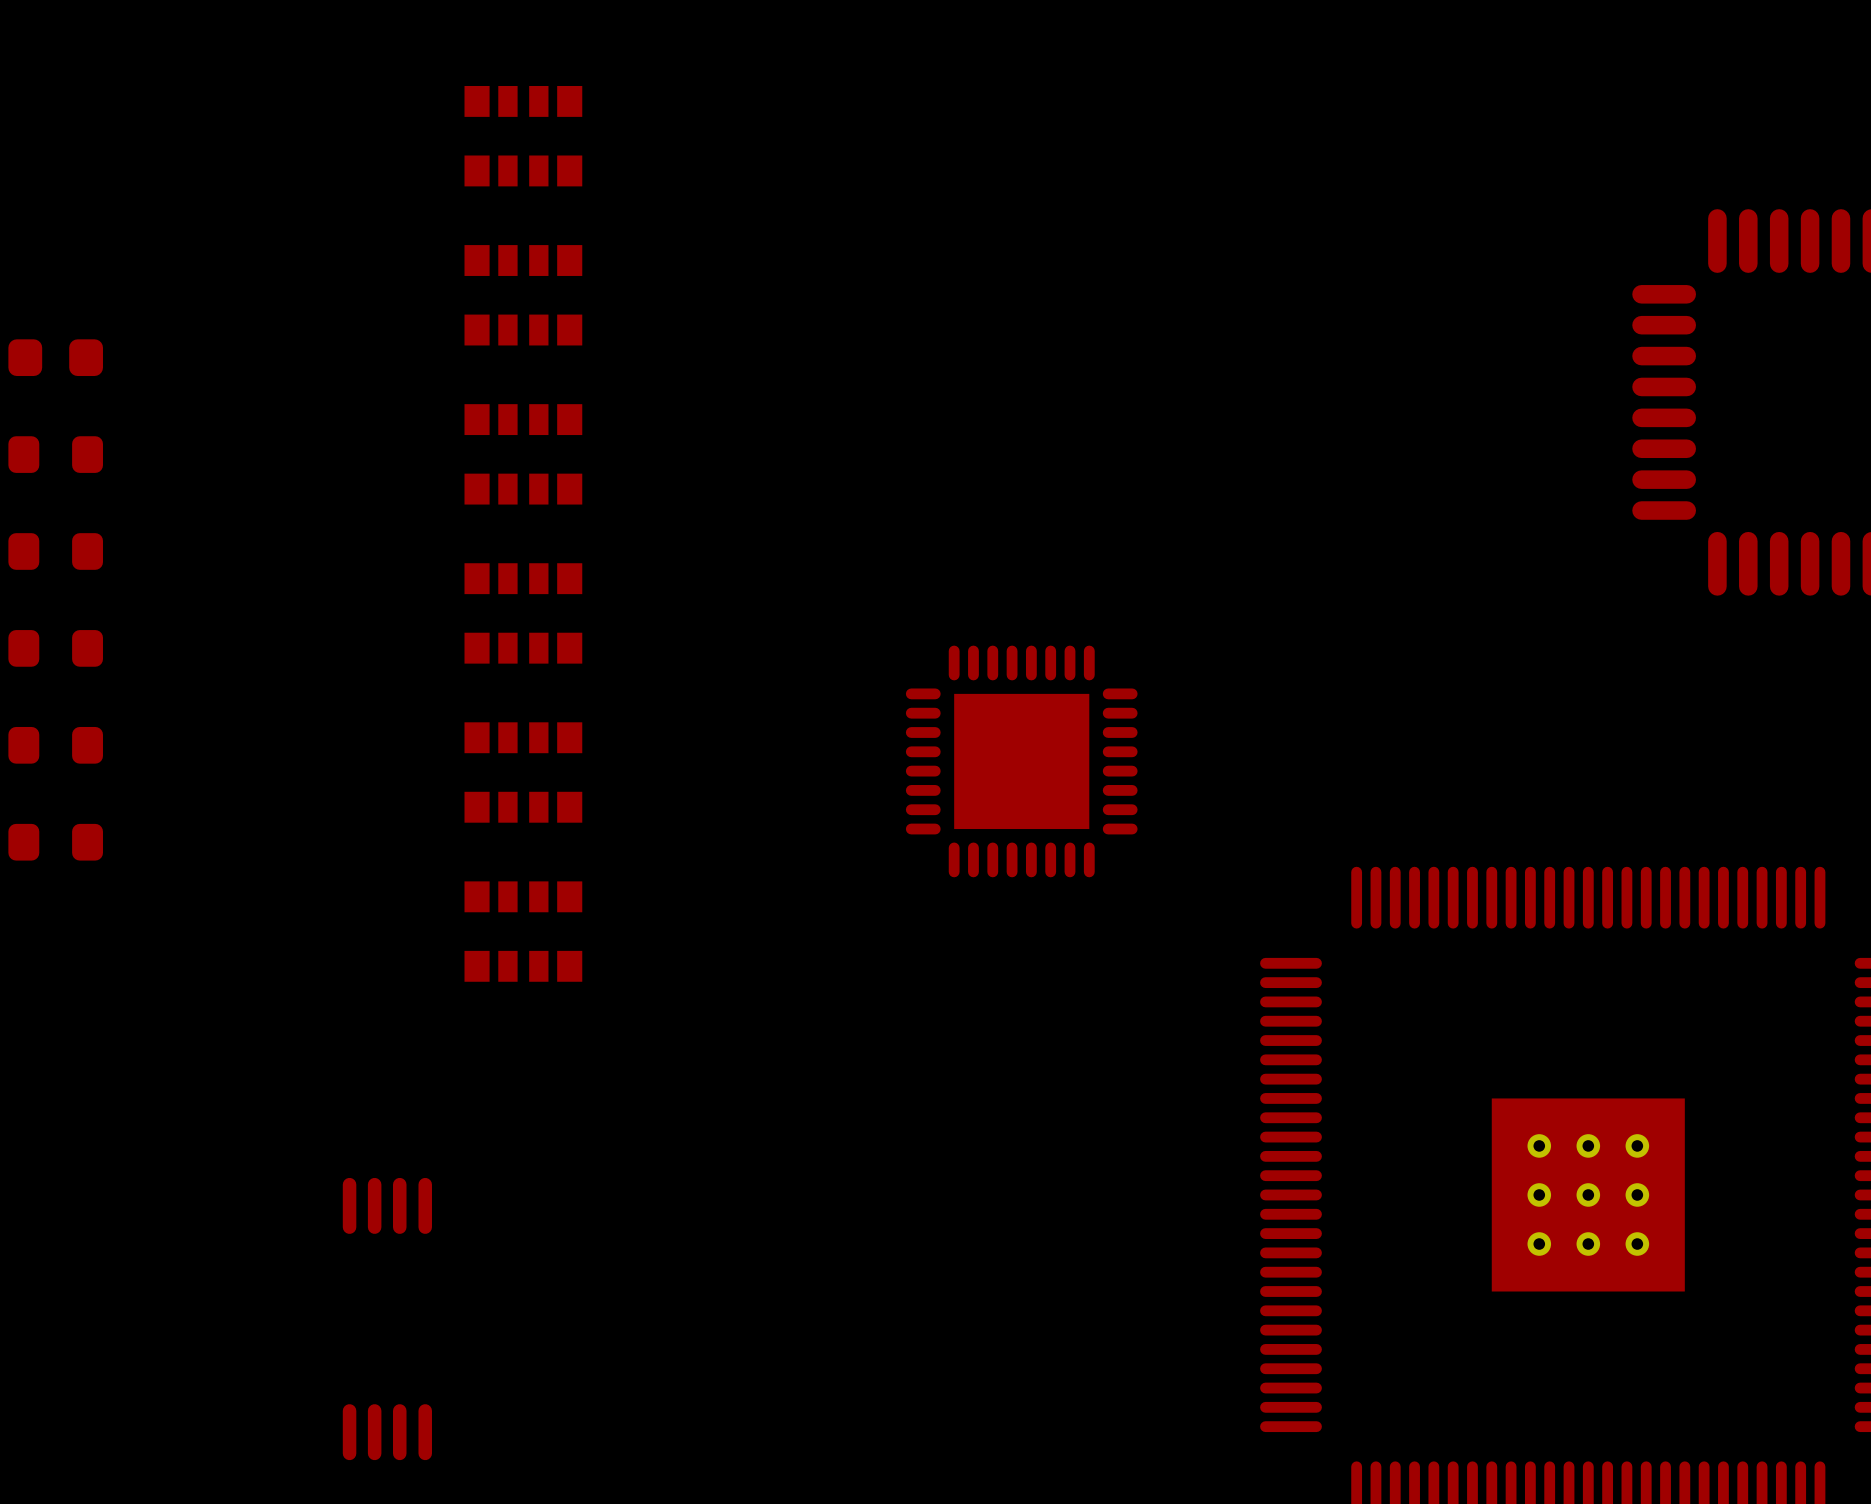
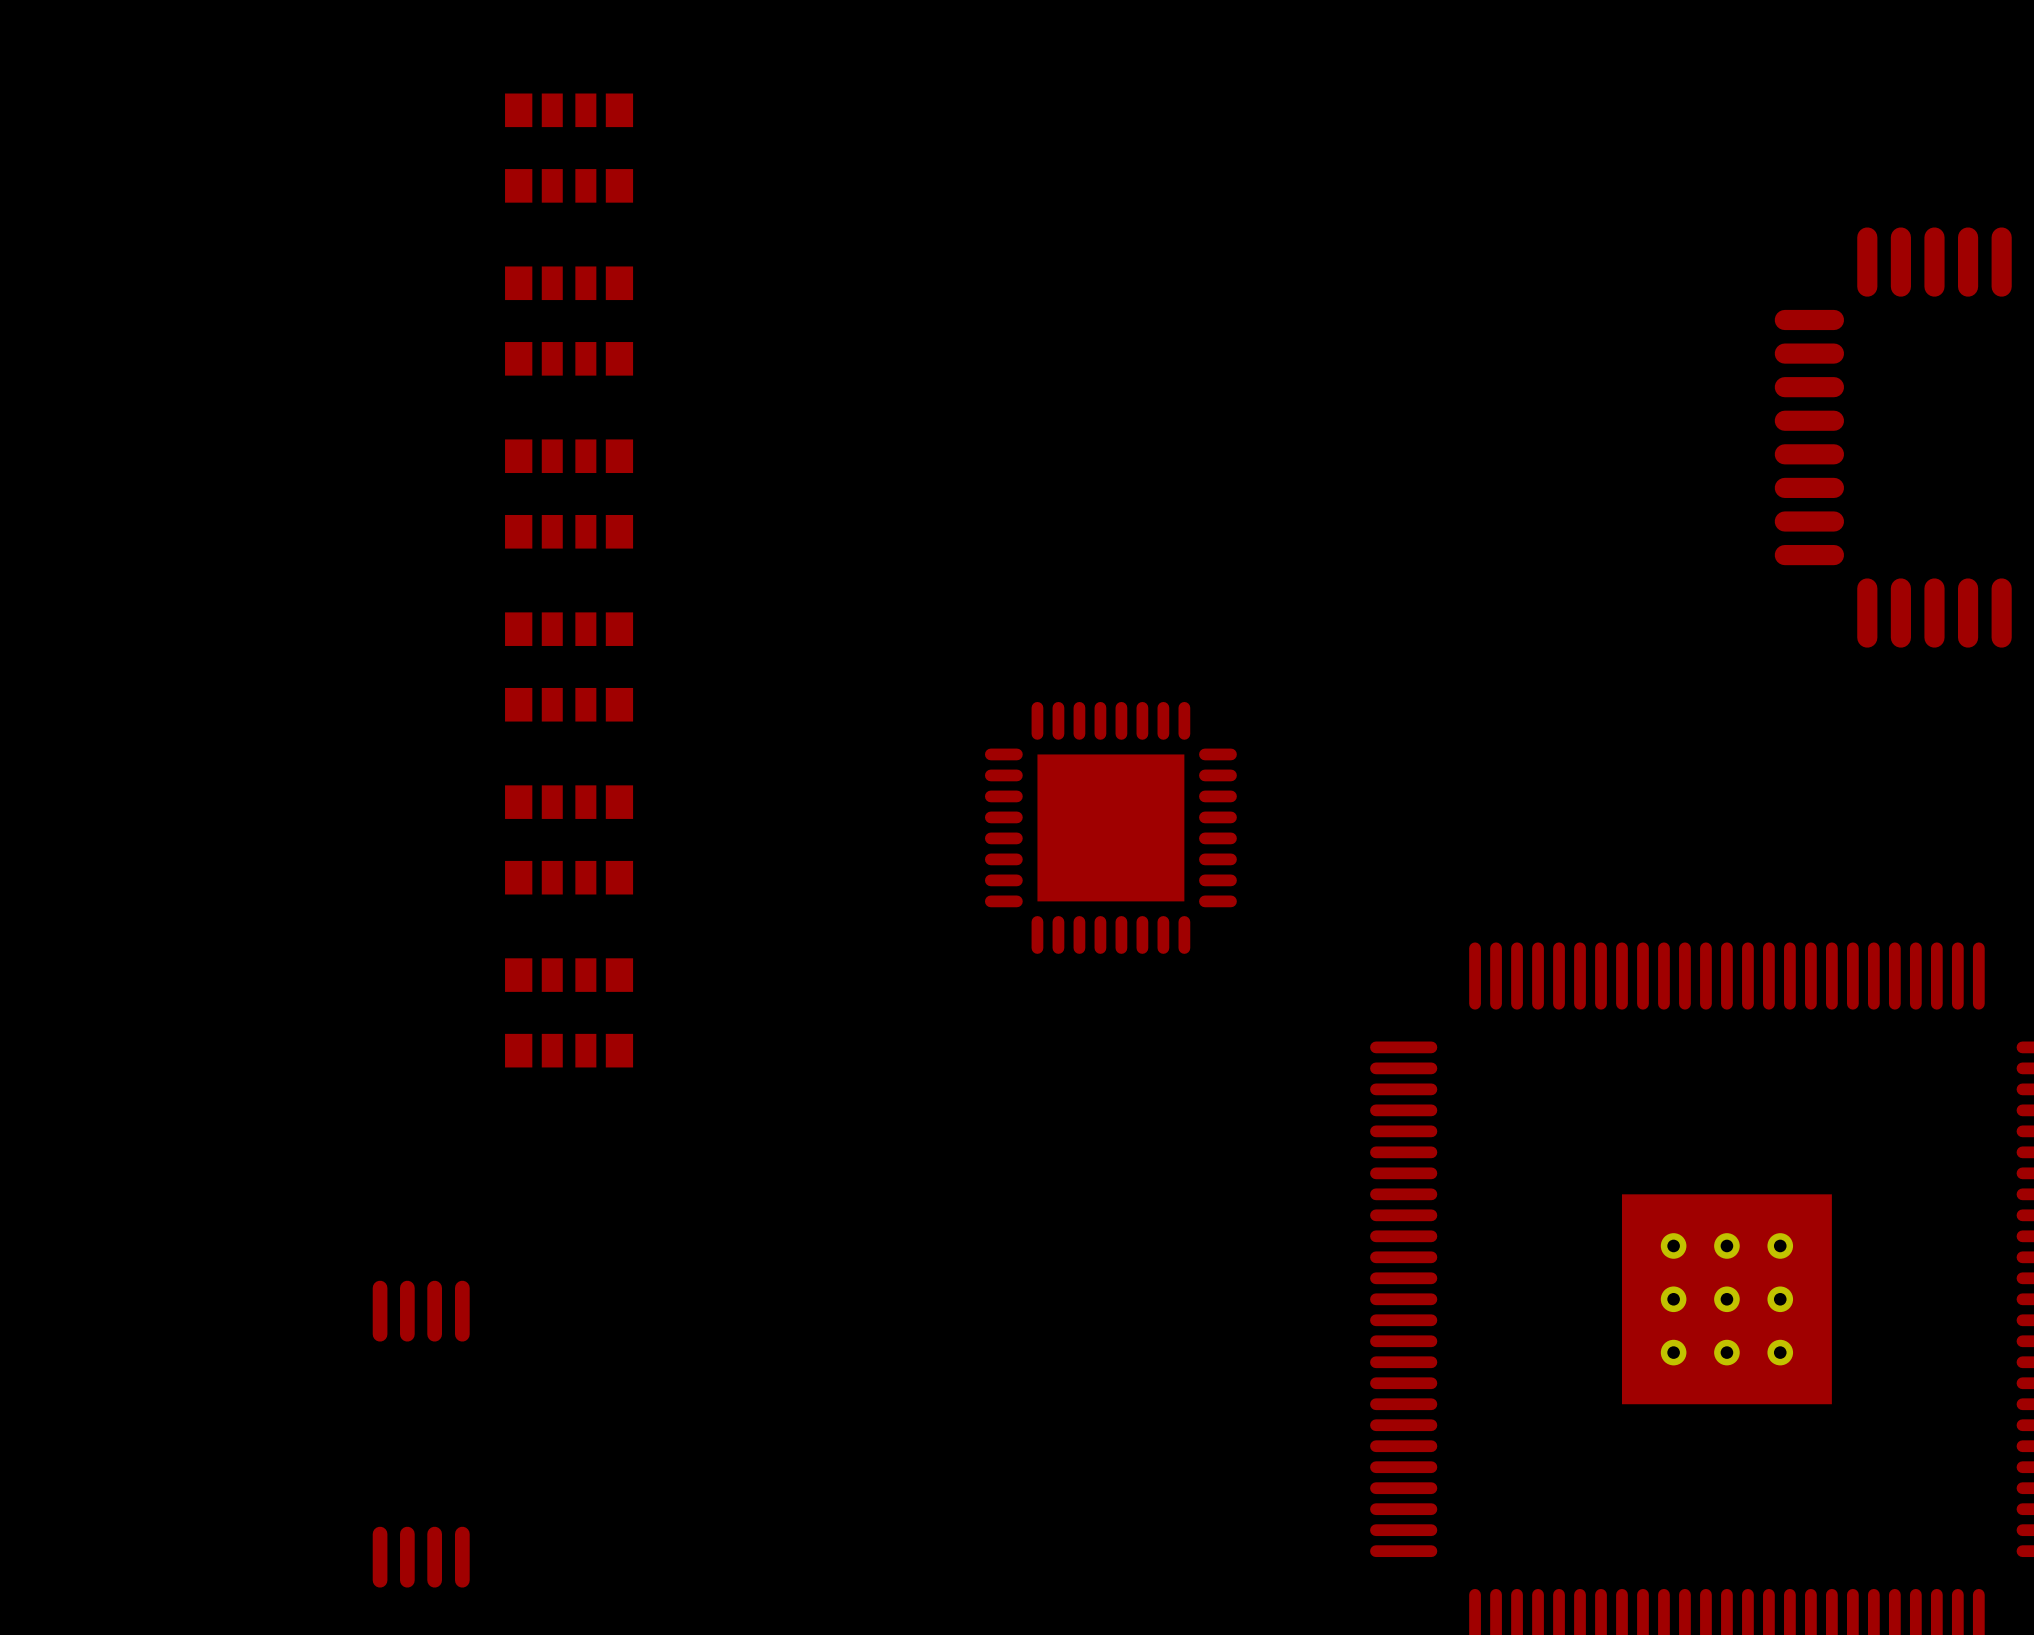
part: (55, 357) -> none
part: (55, 454) -> none
part: (55, 551) -> none
part: (55, 648) -> none
part: (55, 745) -> none
part: (55, 842) -> none

